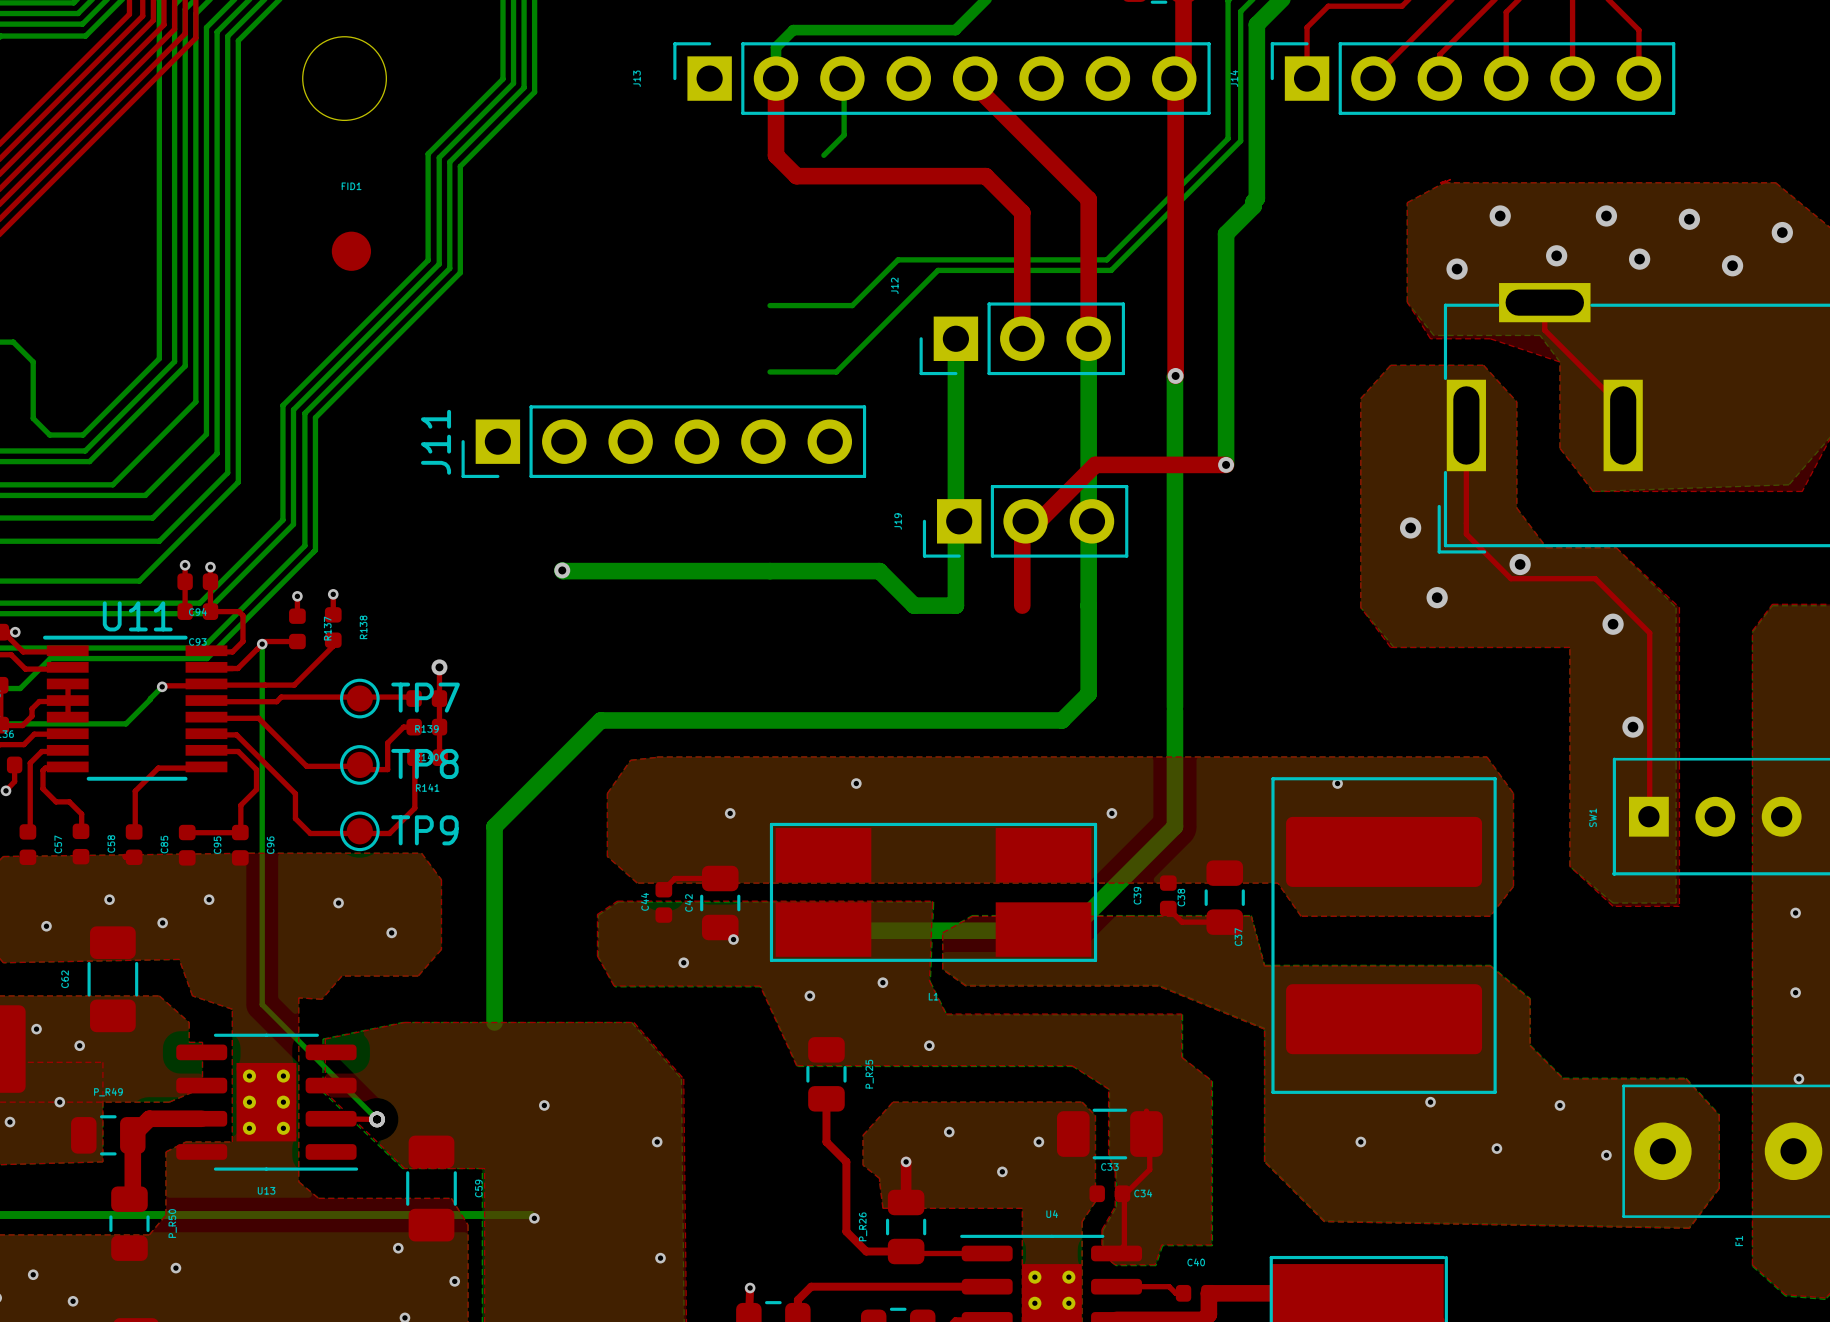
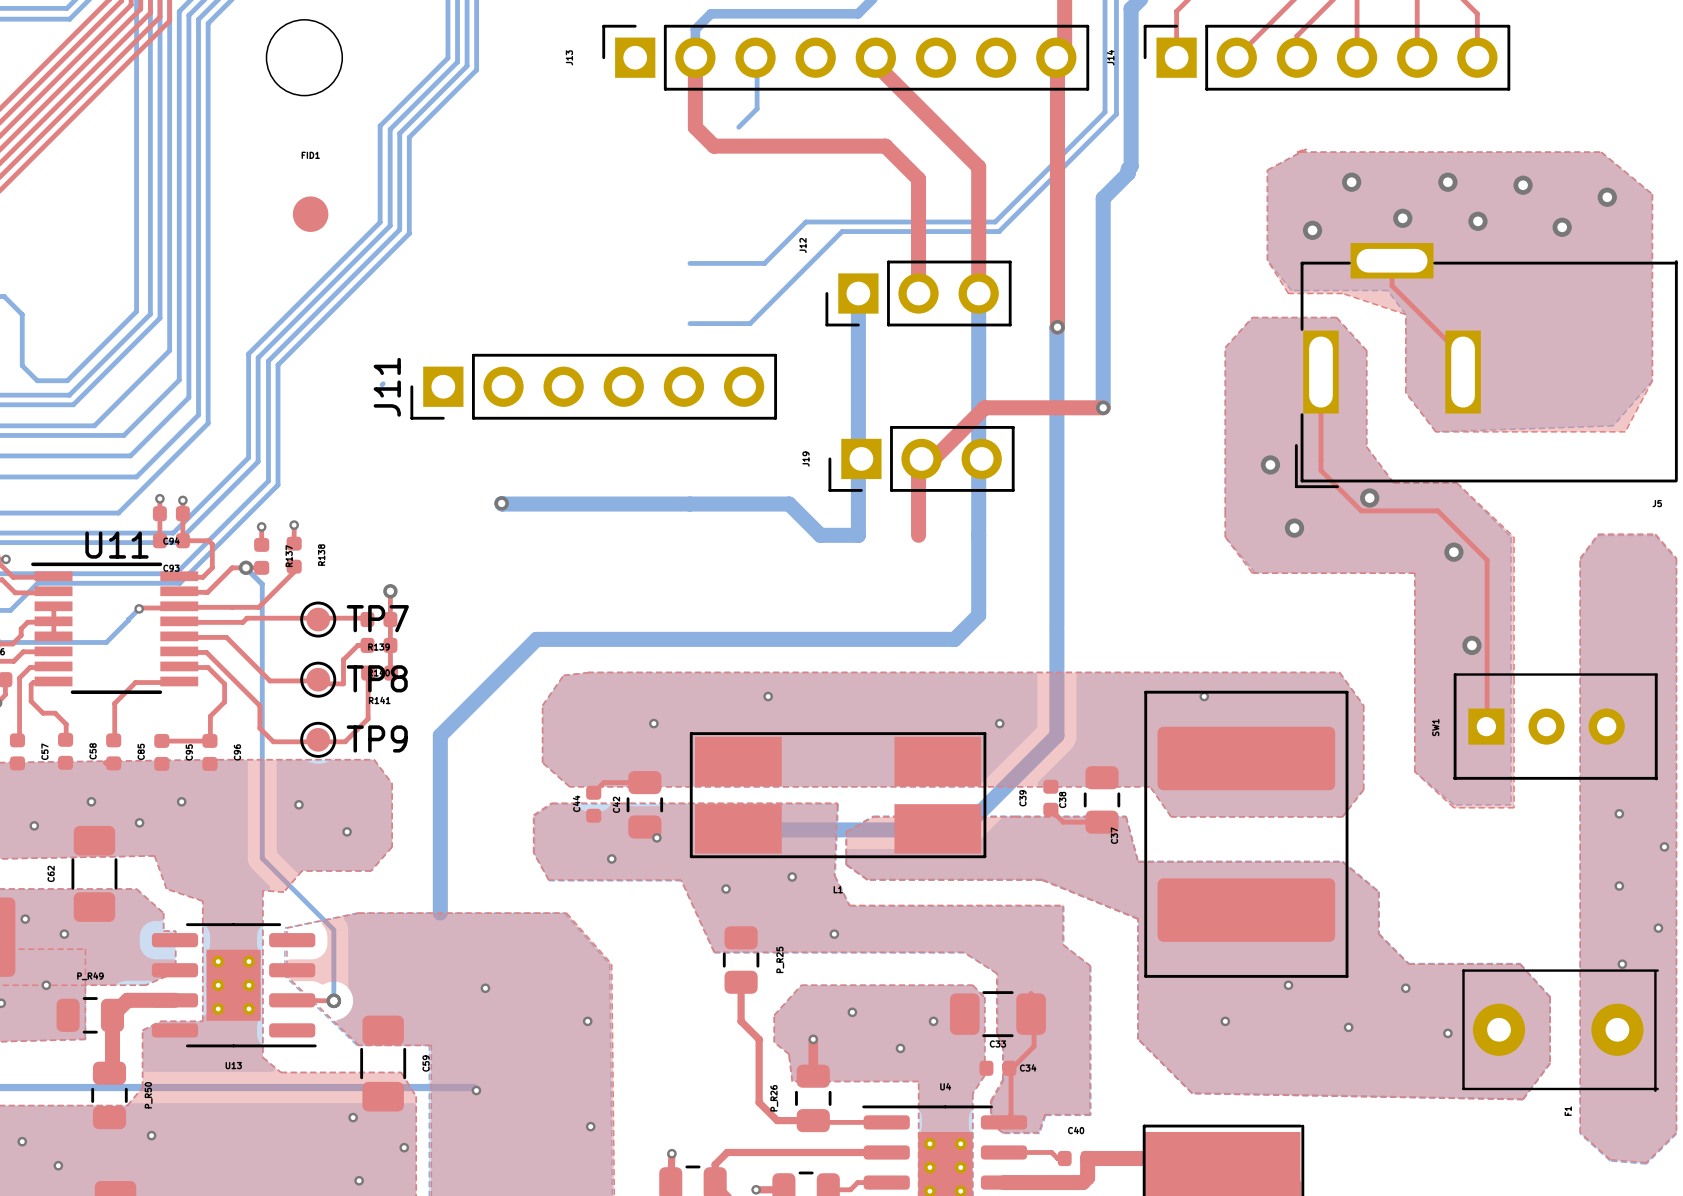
bottom track: none -> (383, 383) (382, 384)
via: none -> (246, 567)
bottom track: (262, 644) (262, 1004) (377, 1119) -> (261, 584) (246, 567) (262, 584) (262, 858) (333, 929) (333, 1000)
via: (262, 644) -> none

